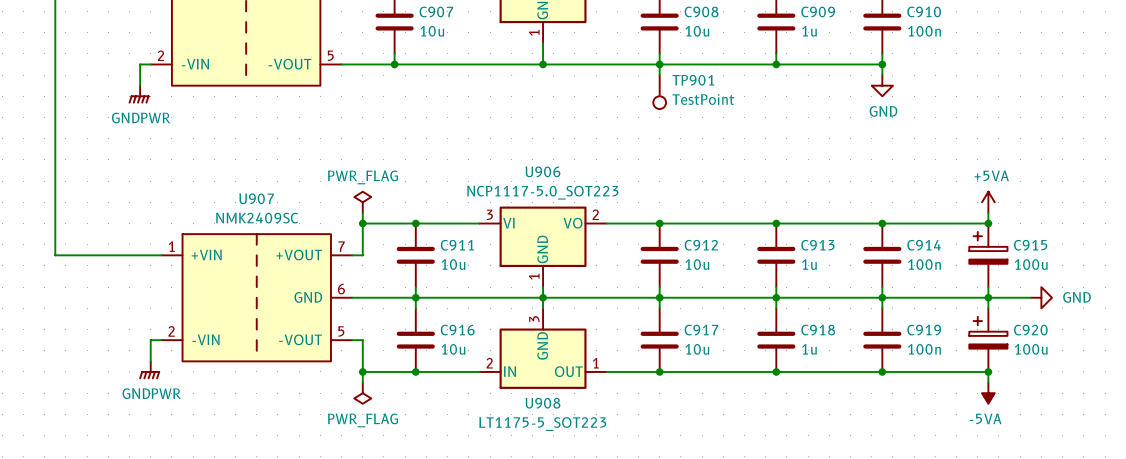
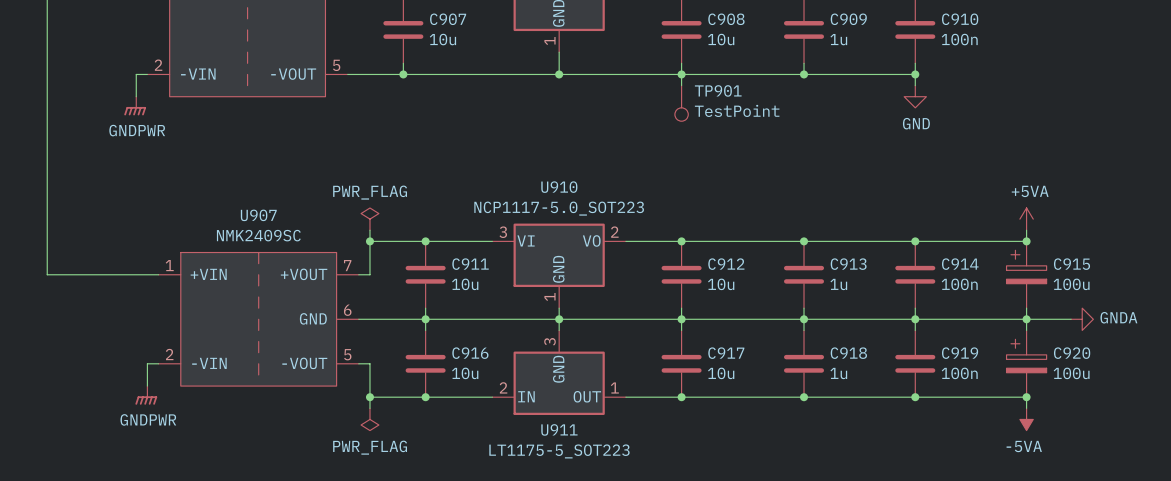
U906 name: U906 (542, 171) -> U910 (559, 187)
power symbol: GND (1041, 297) -> GNDA (1082, 319)
U908 name: U908 (542, 403) -> U911 (559, 429)

